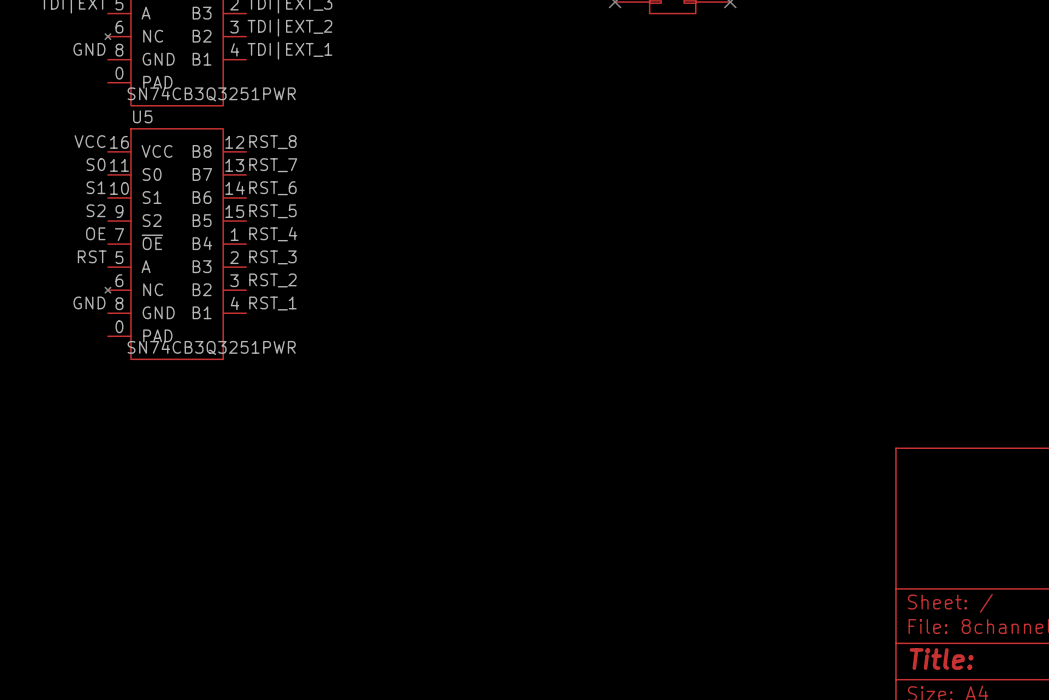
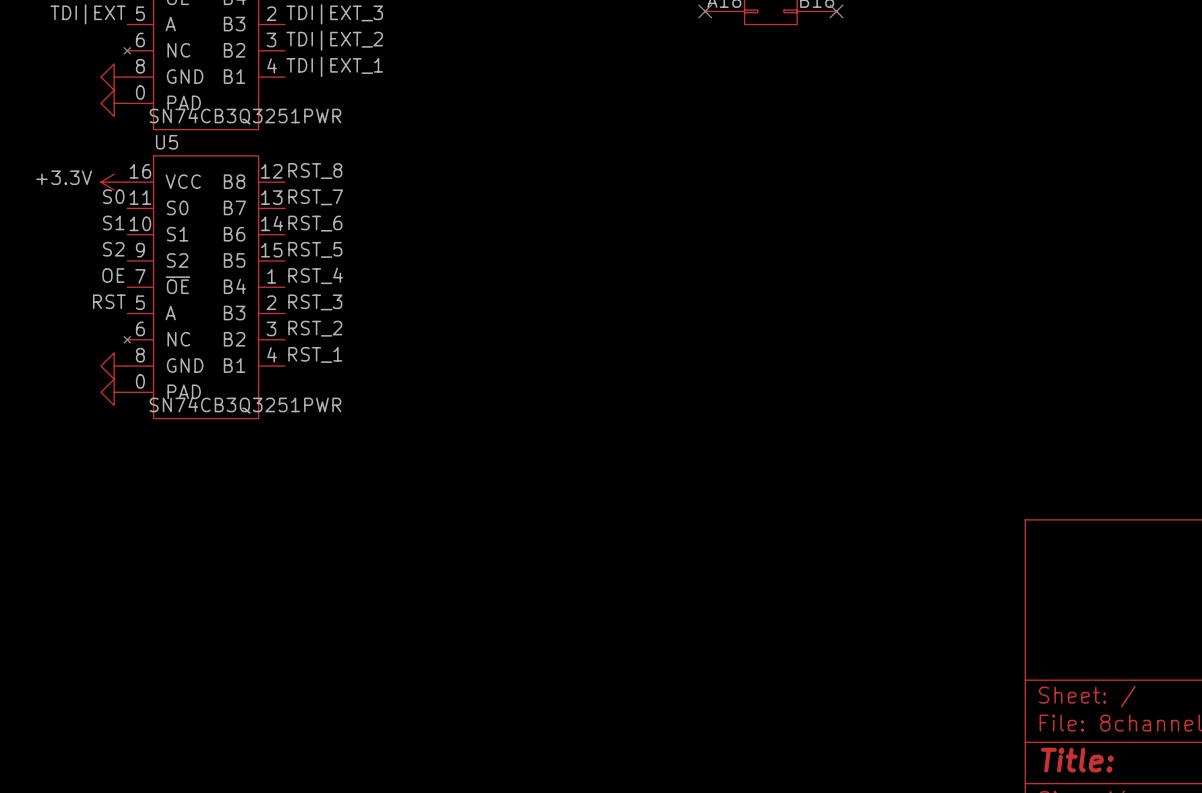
label: GND (89, 49) -> none
power symbol: none -> (114, 77)
power symbol: none -> (114, 103)
label: VCC (90, 141) -> none
power symbol: none -> +3.3V (114, 182)
label: GND (89, 302) -> none
power symbol: none -> (114, 366)
power symbol: none -> (114, 392)

